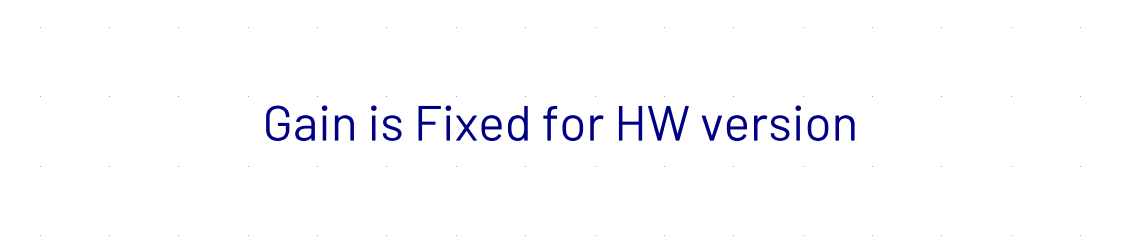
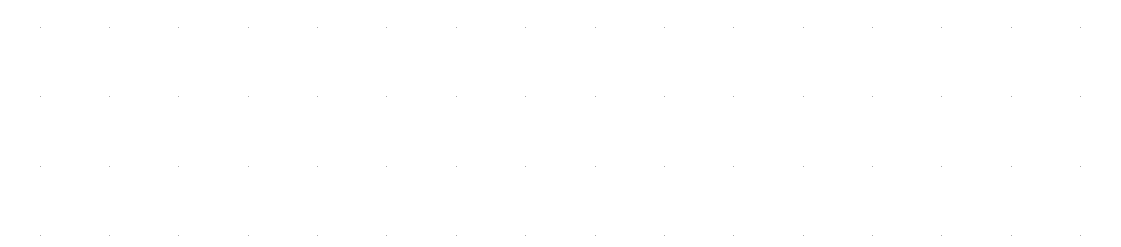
text: Gain is Fixed for HW version (560, 123) -> none

